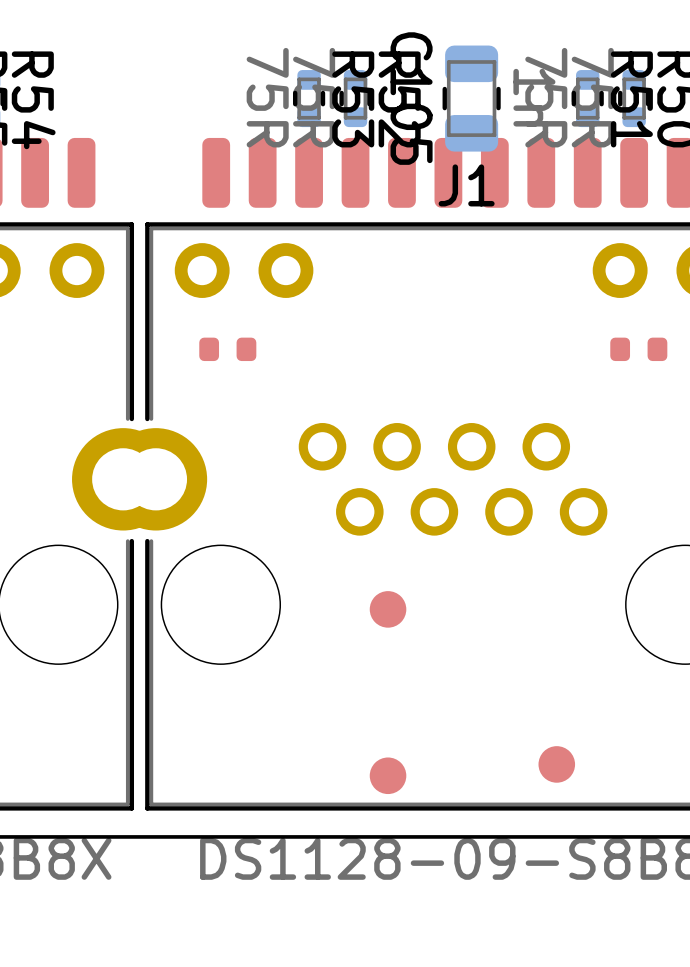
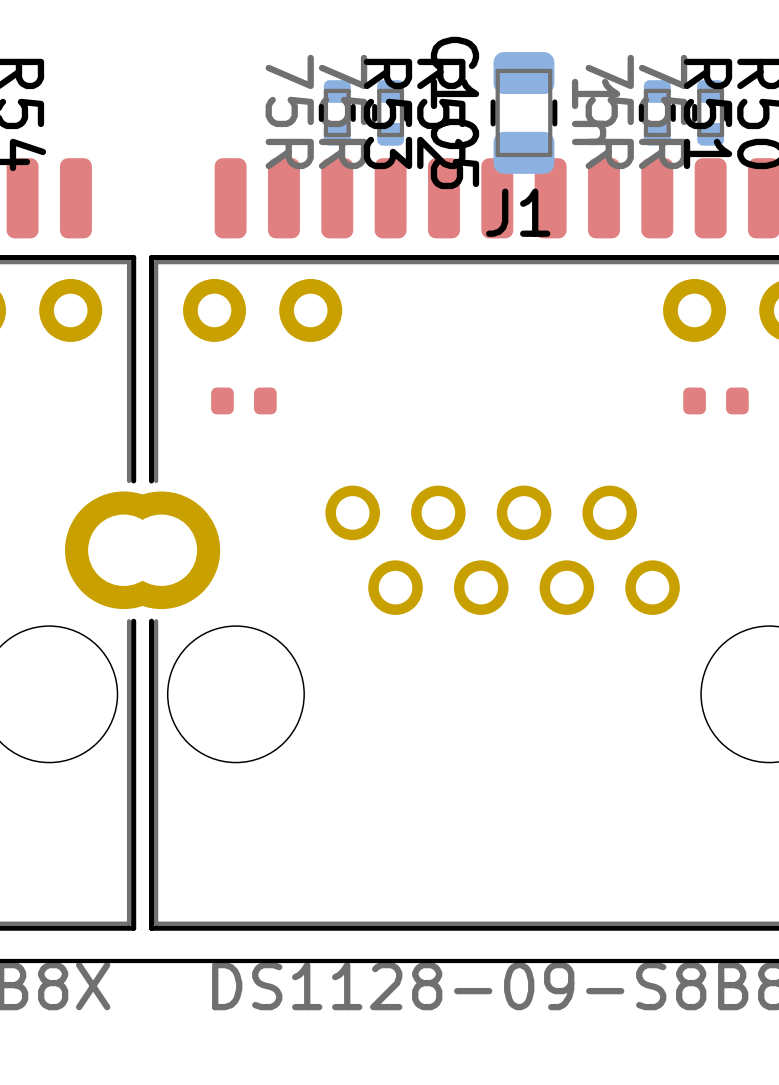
part: (388, 609) -> none
part: (556, 764) -> none
part: (388, 775) -> none

